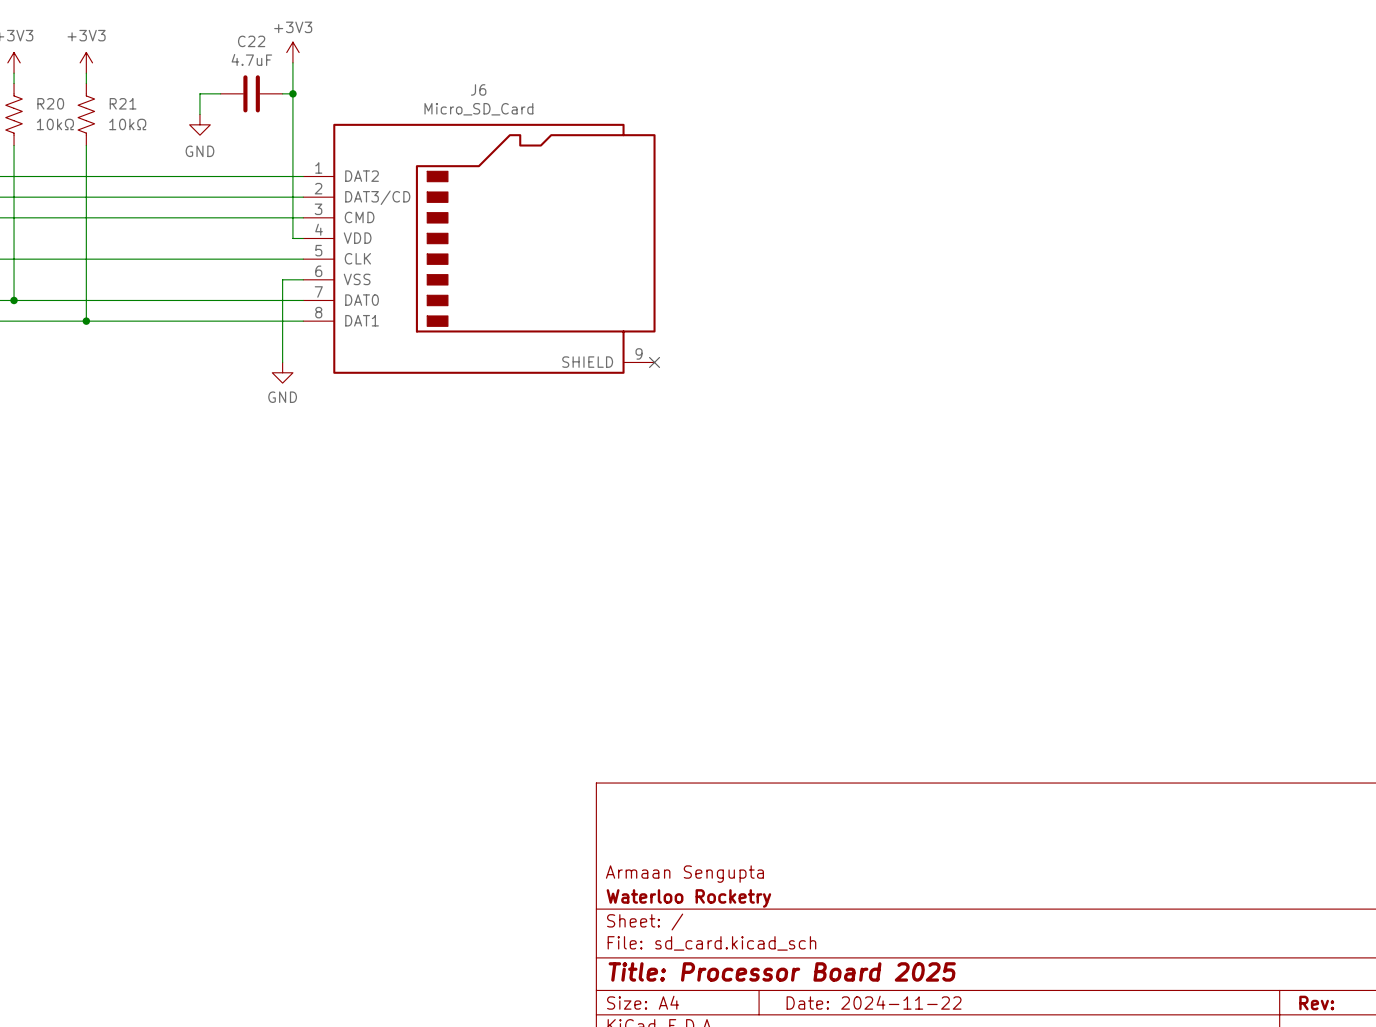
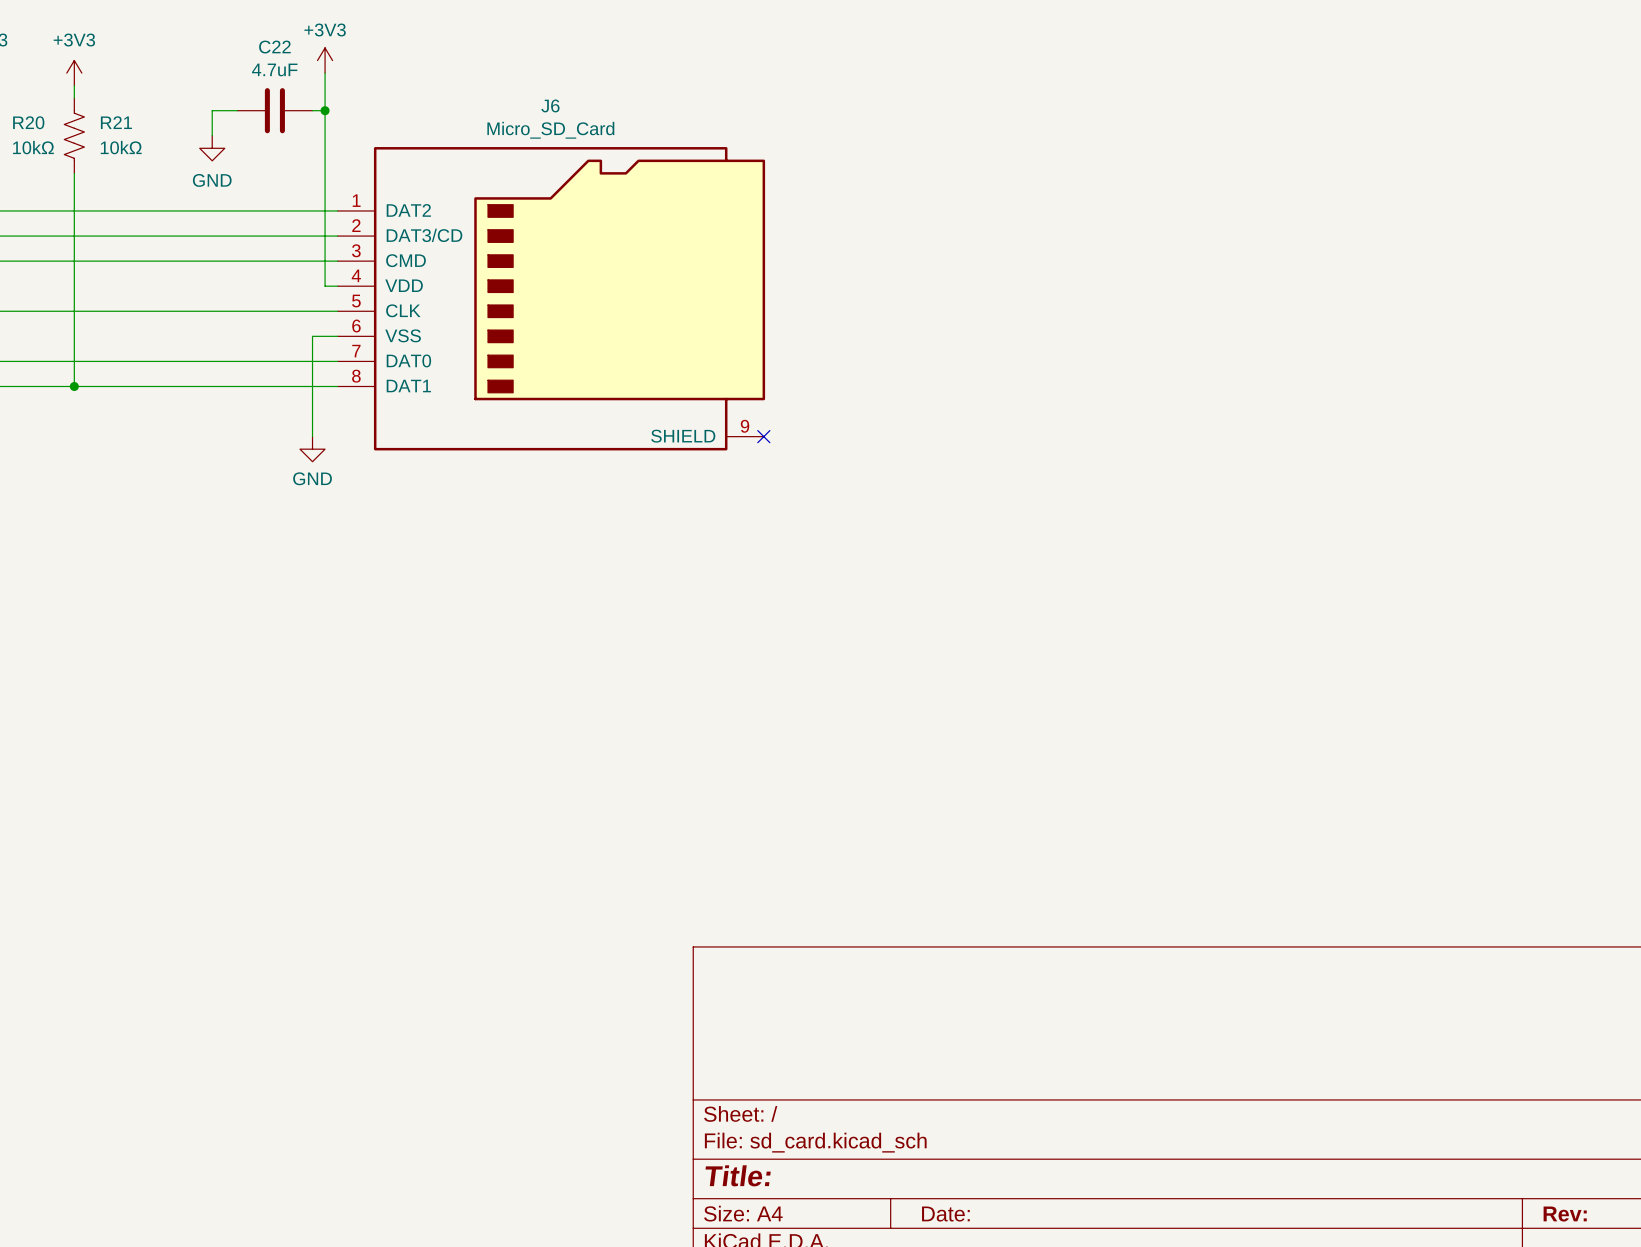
title block: Armaan Sengupta (684, 874) -> none
title block: Waterloo Rocketry (688, 898) -> none
title block: Title: Processor Board 2025 (782, 971) -> Title: (738, 1175)
title block: Date: 2024-11-22 (874, 1002) -> Date: (945, 1214)

